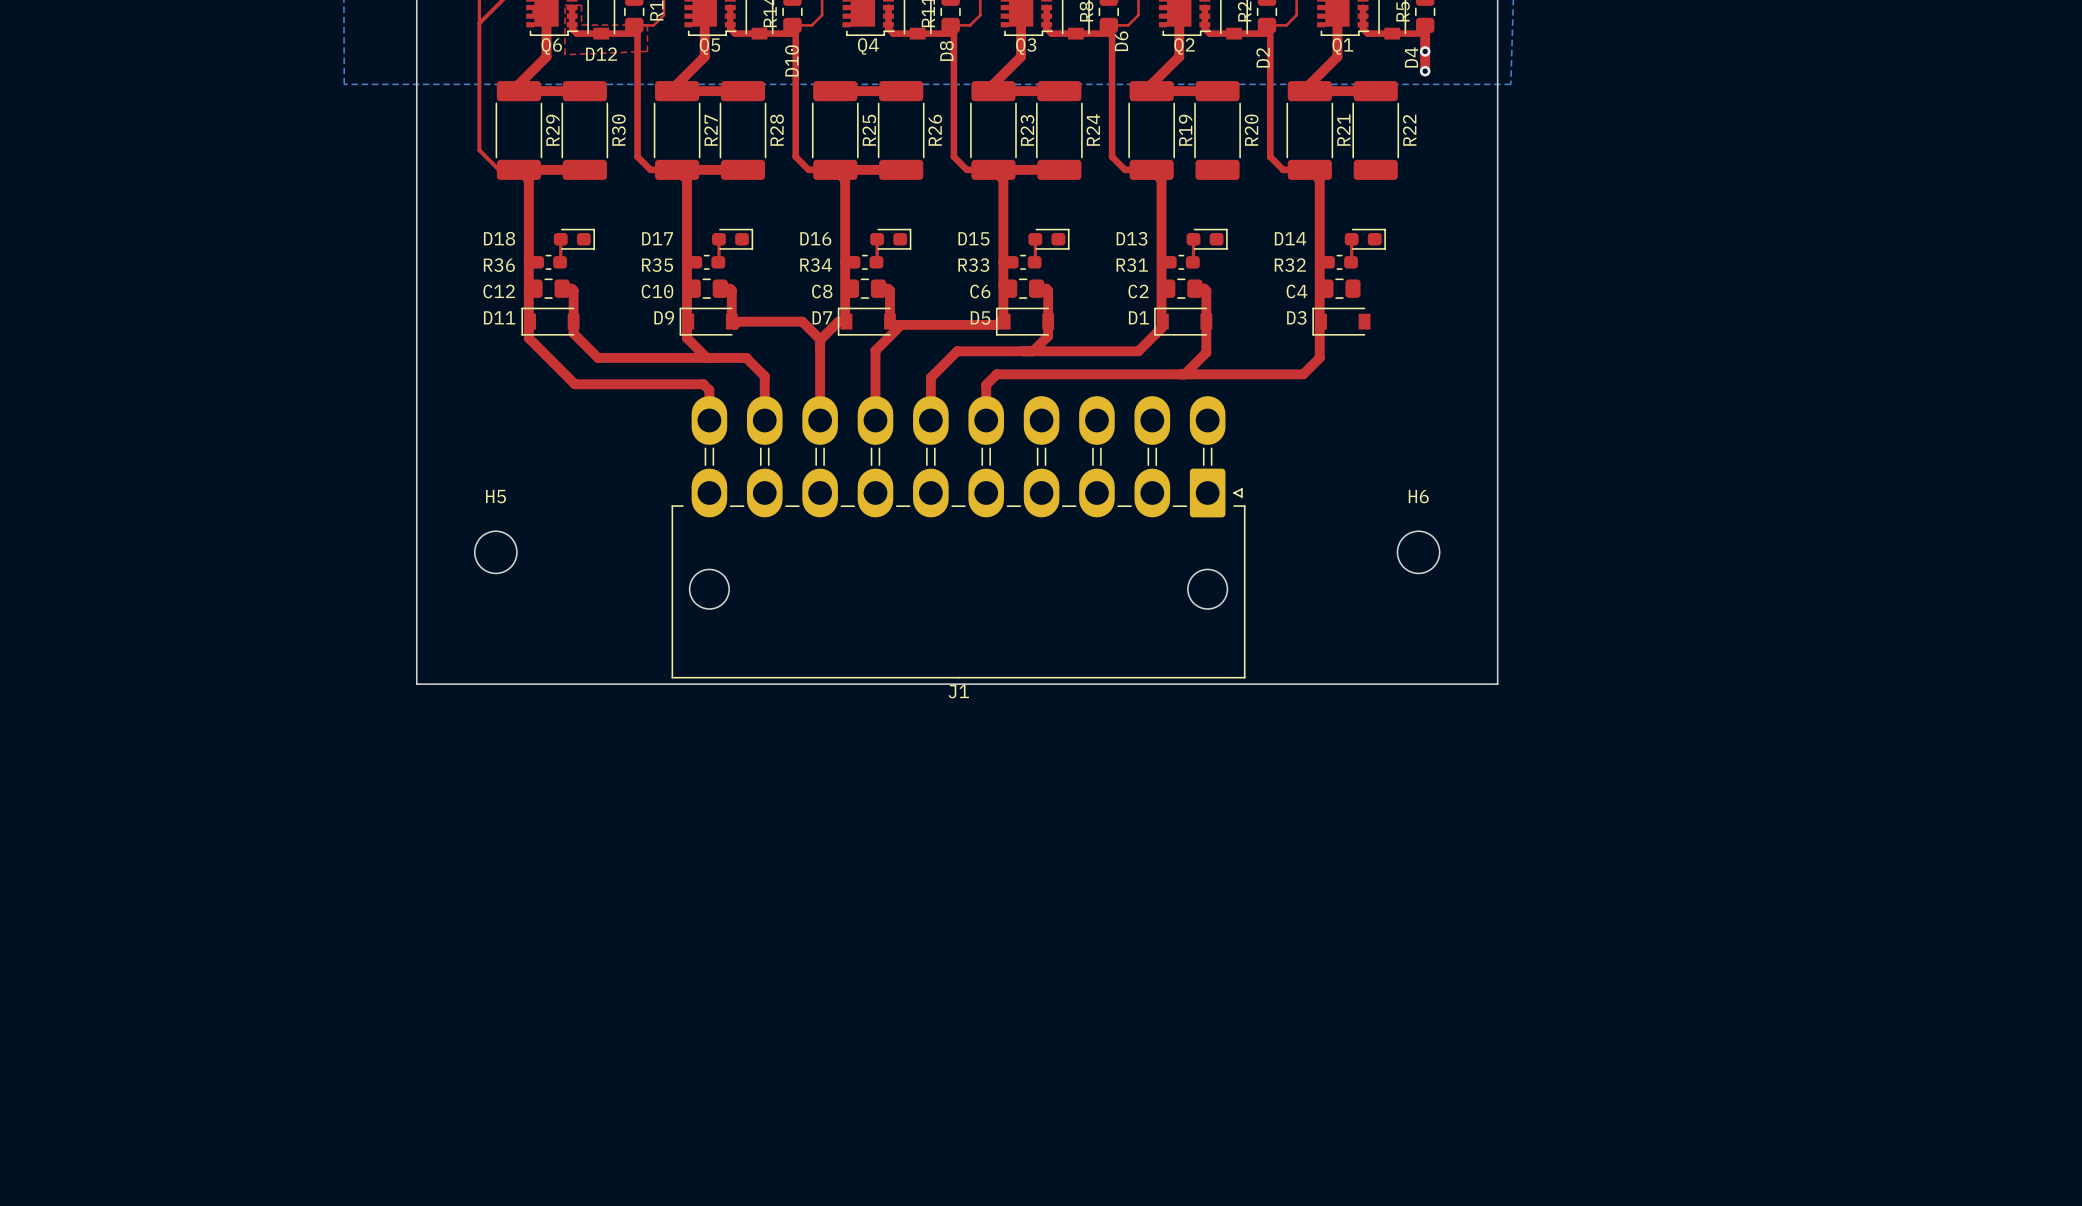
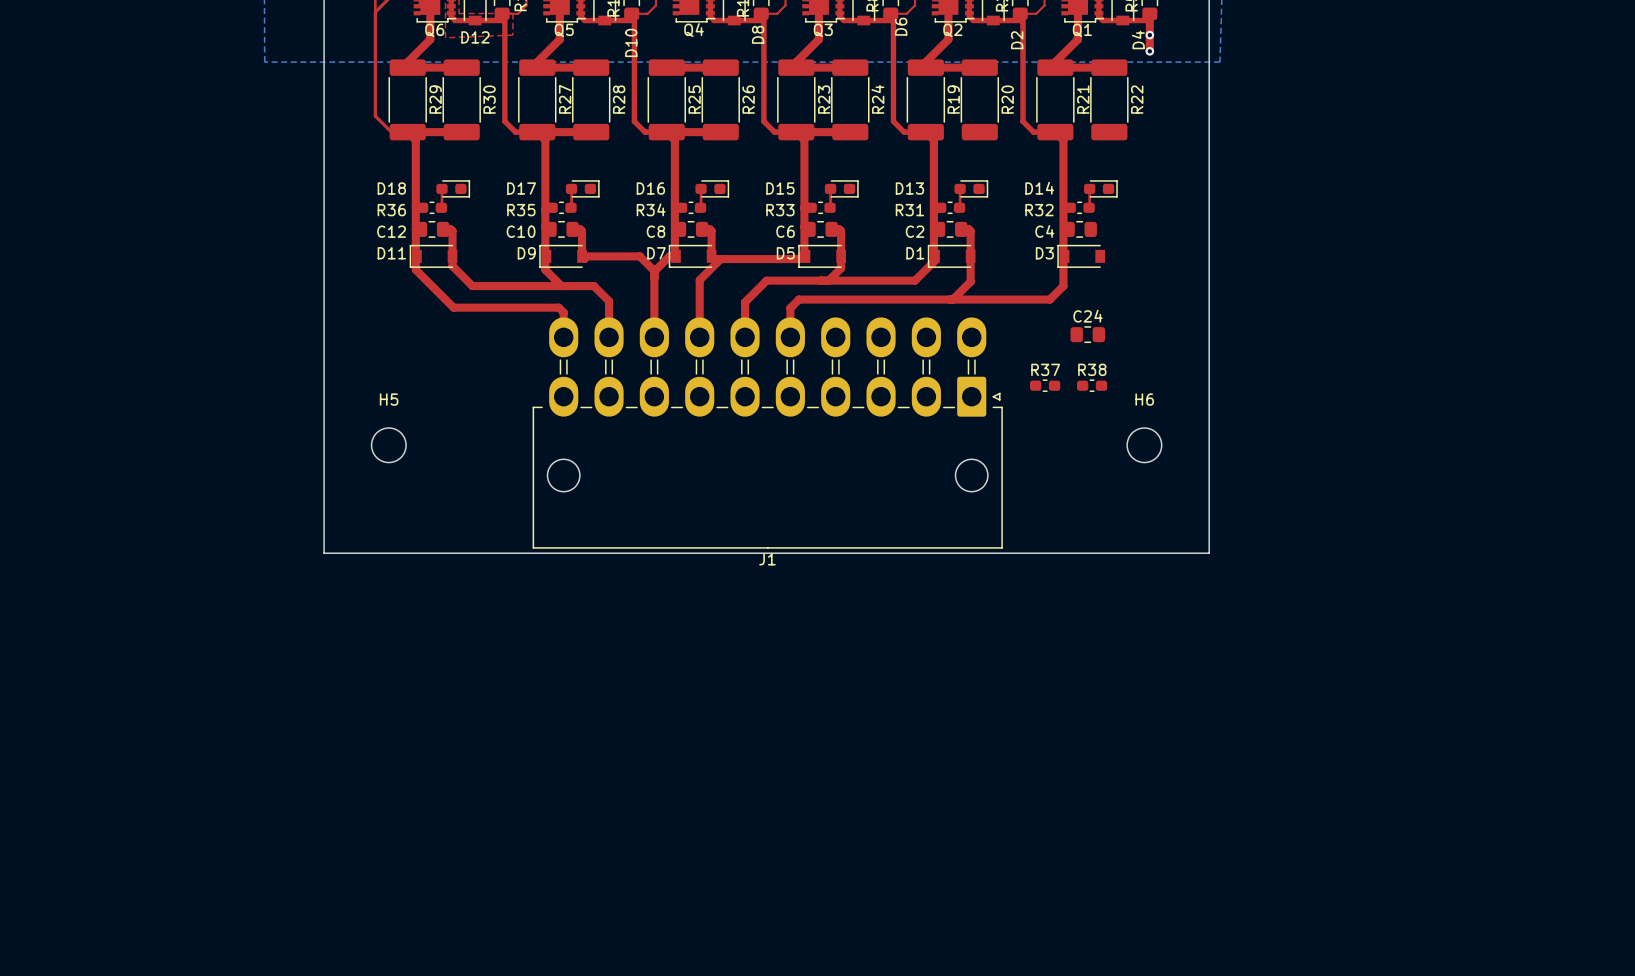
C24: none -> (1087, 334)
R37: none -> (1045, 385)
R38: none -> (1092, 385)

